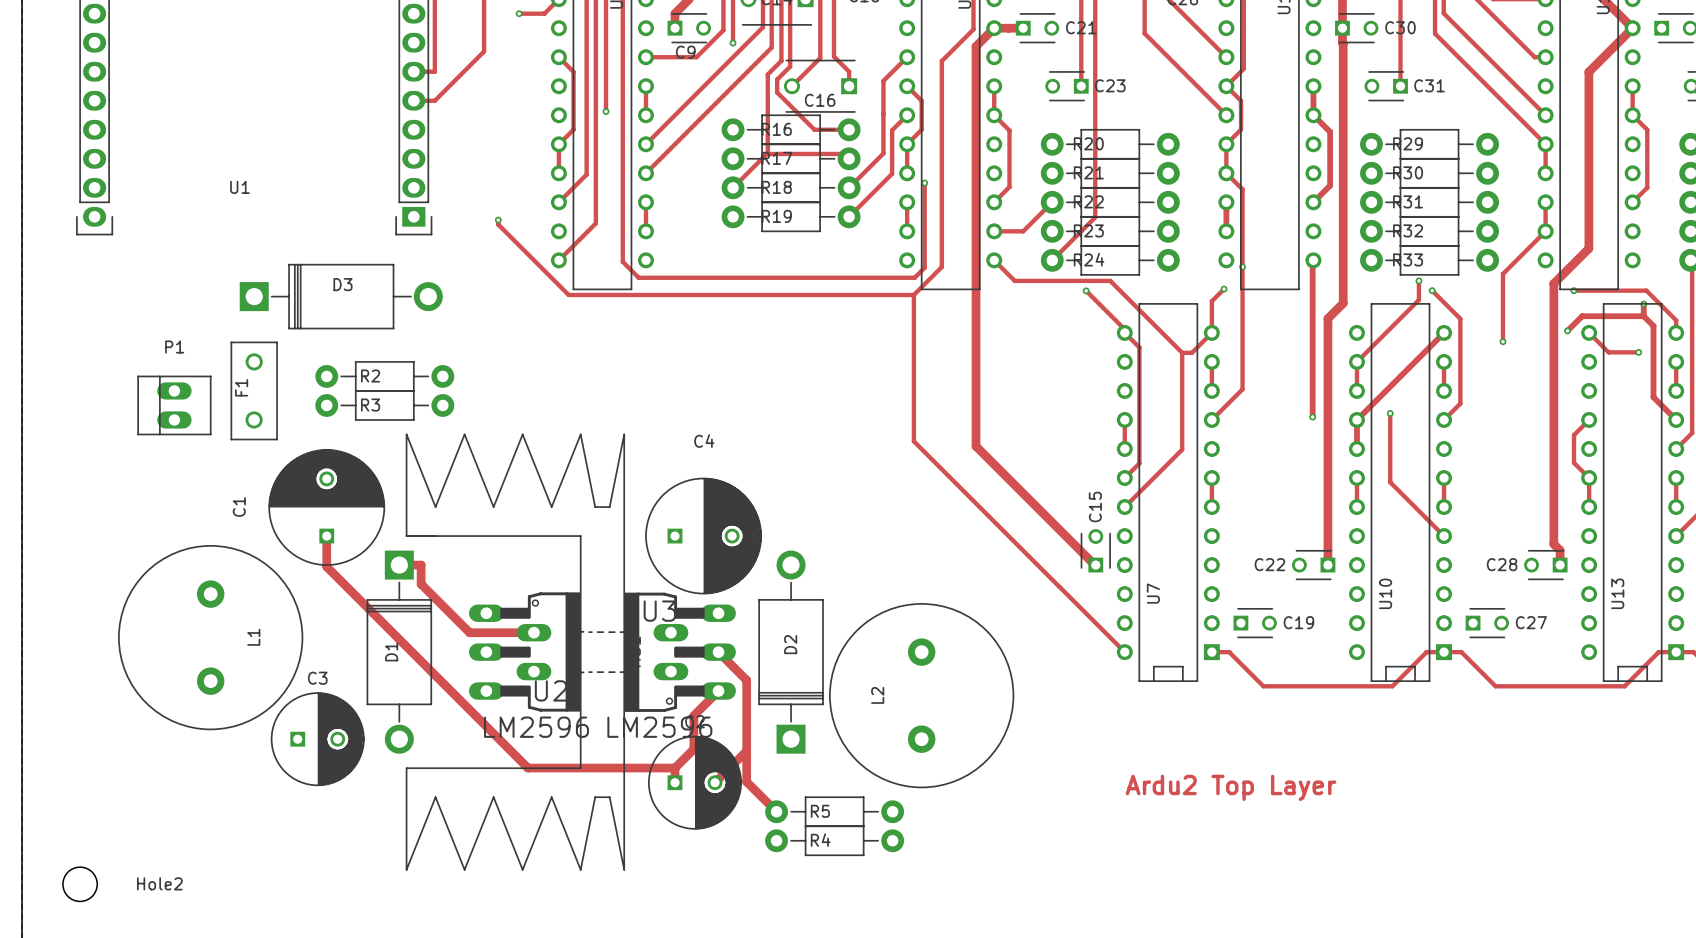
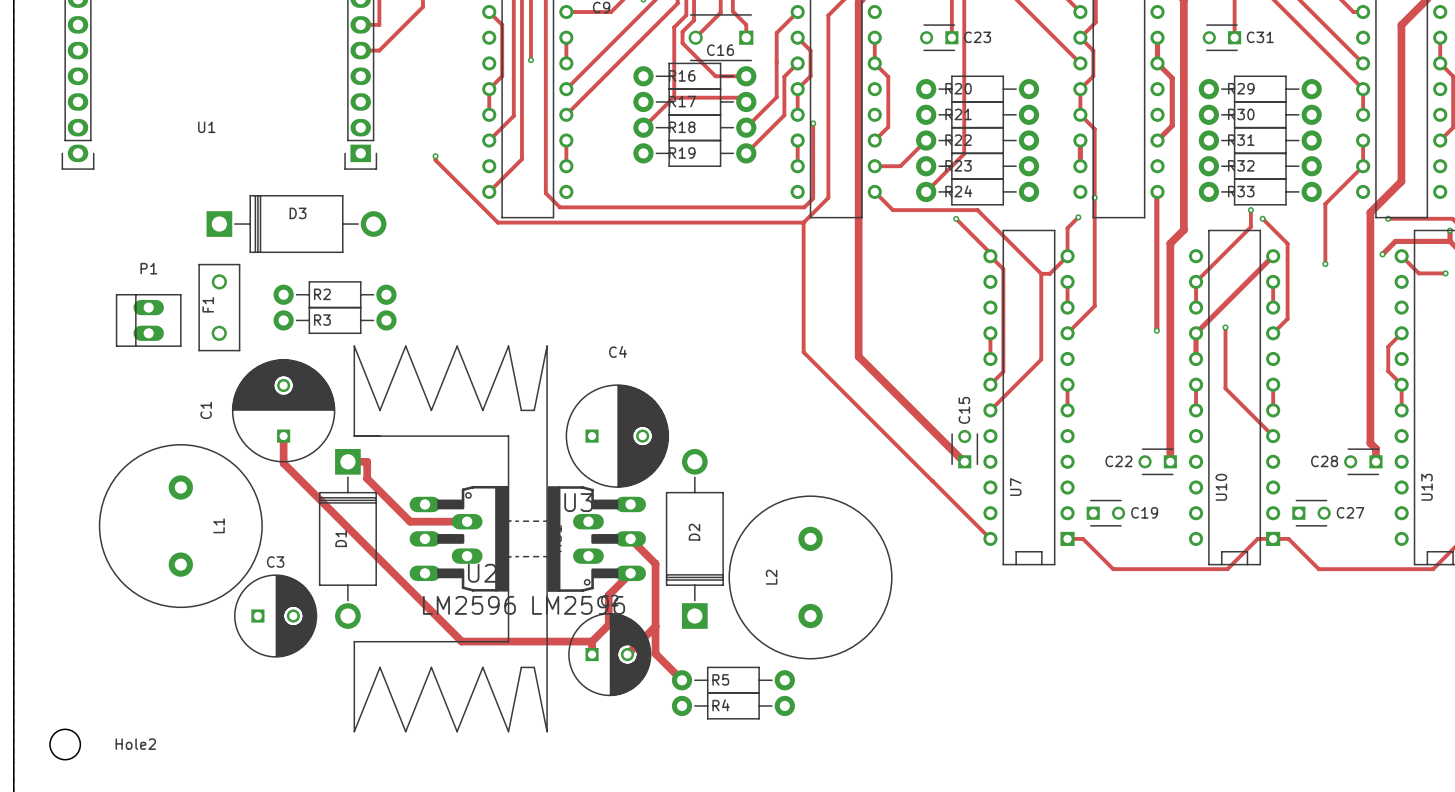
text: Ardu2 Top Layer (1231, 787) -> none

